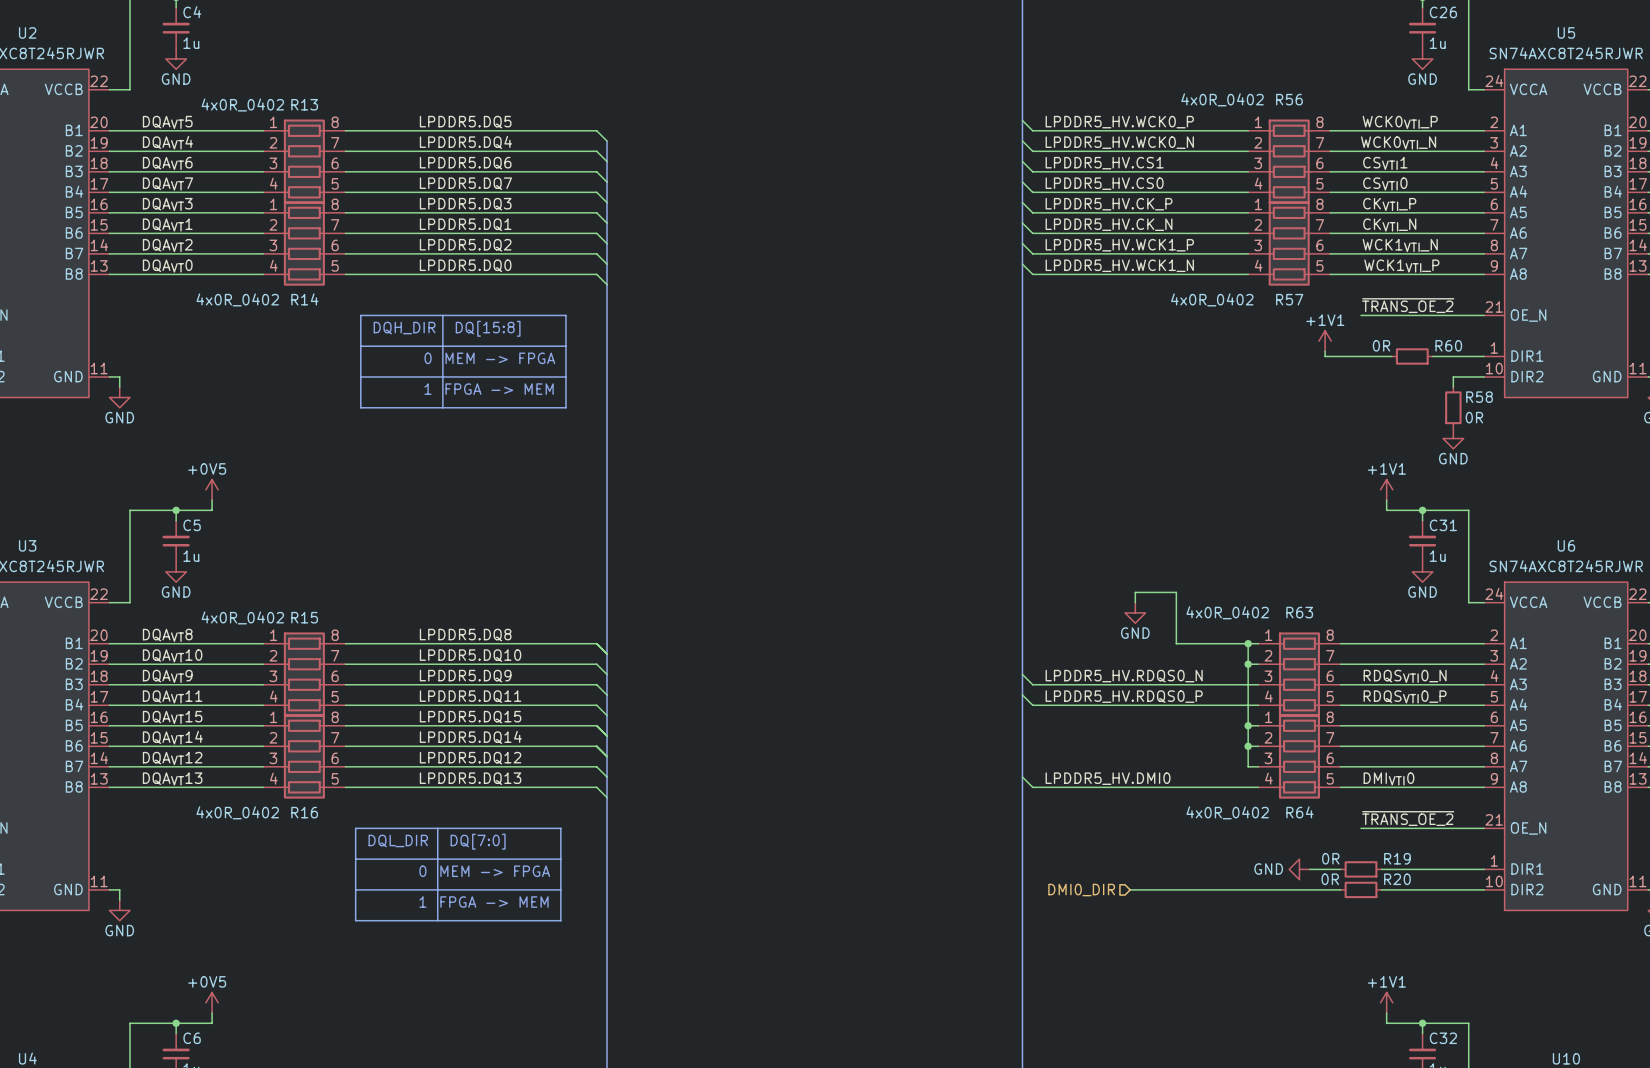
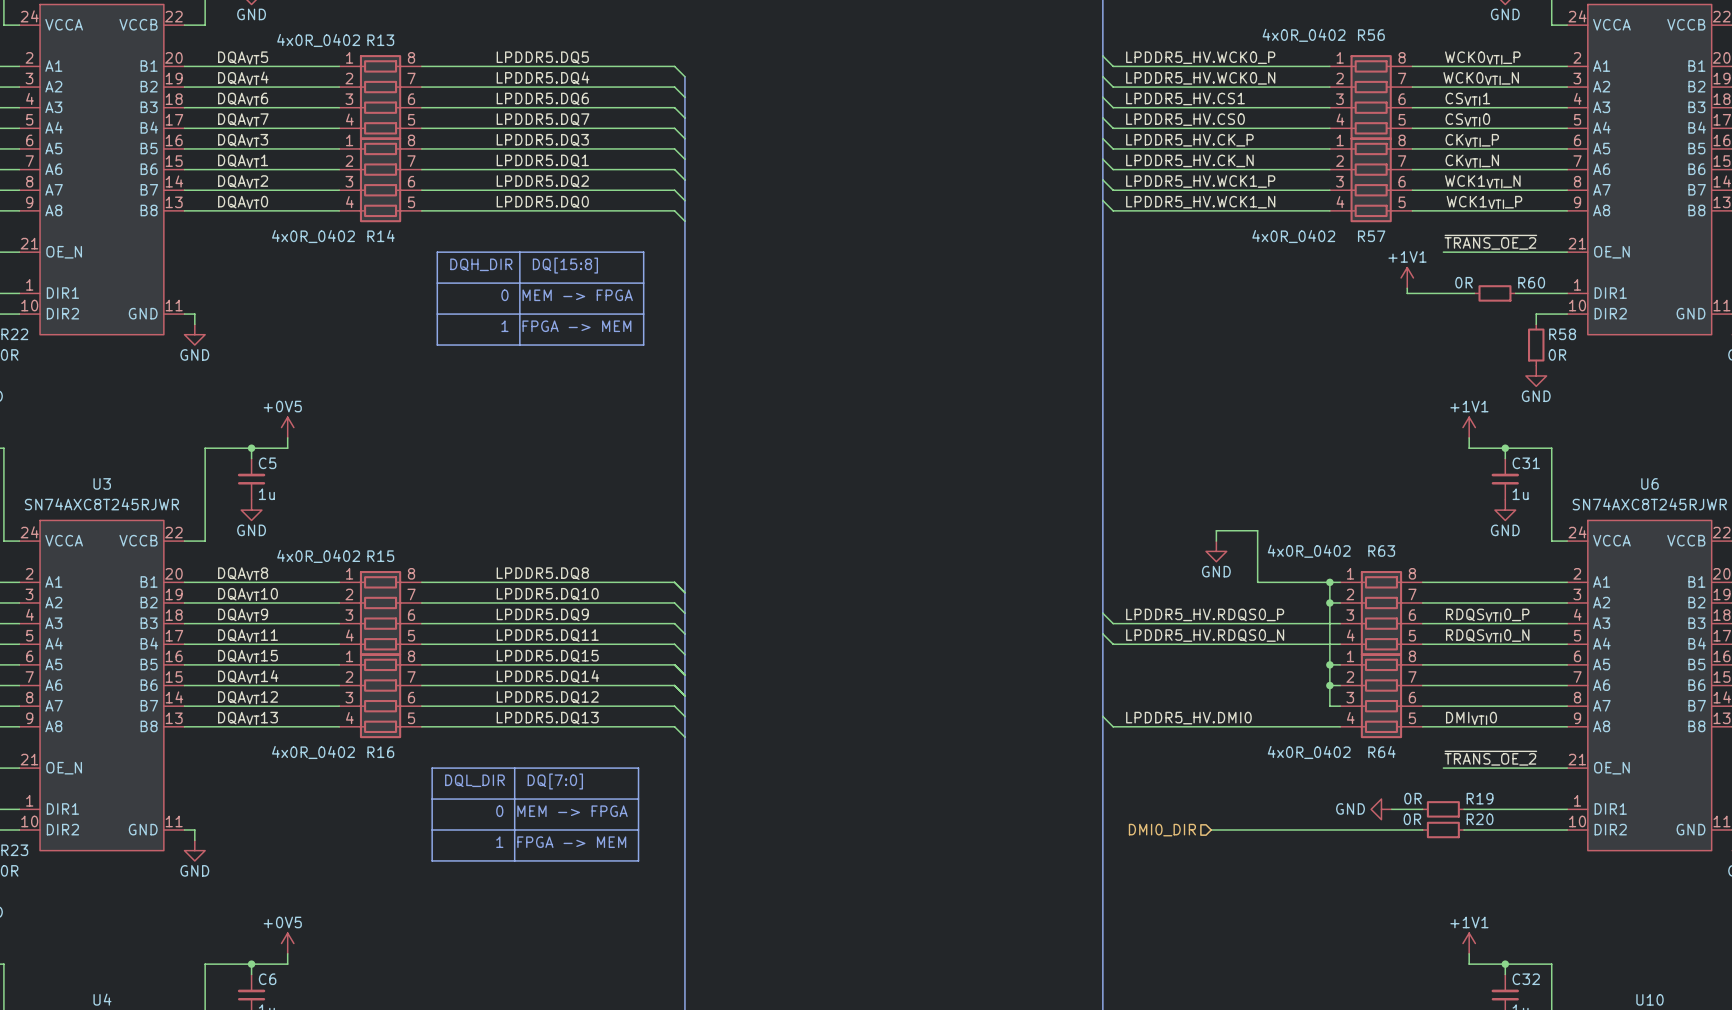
label: LPDDR5_HV.RDQS0_N (1124, 676) -> LPDDR5_HV.RDQS0_P (1205, 614)
label: RDQSVTI0_N (1405, 676) -> RDQSVTI0_P (1487, 615)
label: LPDDR5_HV.RDQS0_P (1124, 696) -> LPDDR5_HV.RDQS0_N (1205, 635)
label: RDQSVTI0_P (1405, 696) -> RDQSVTI0_N (1487, 635)

